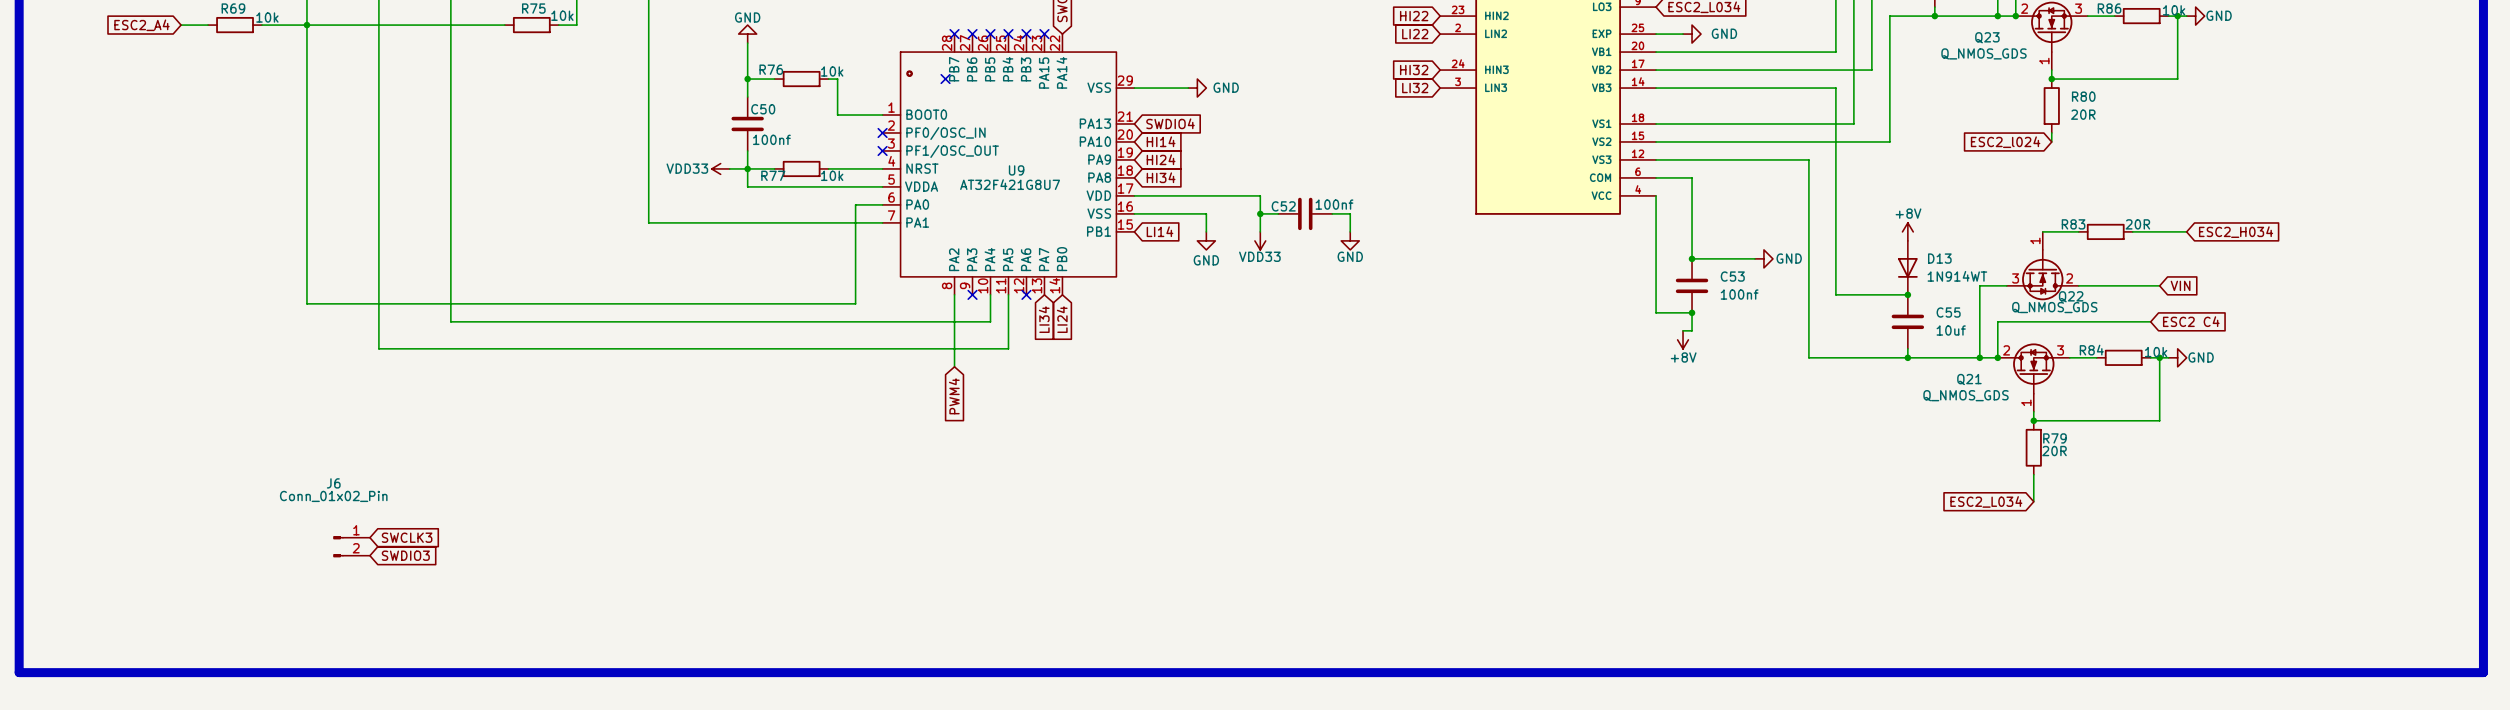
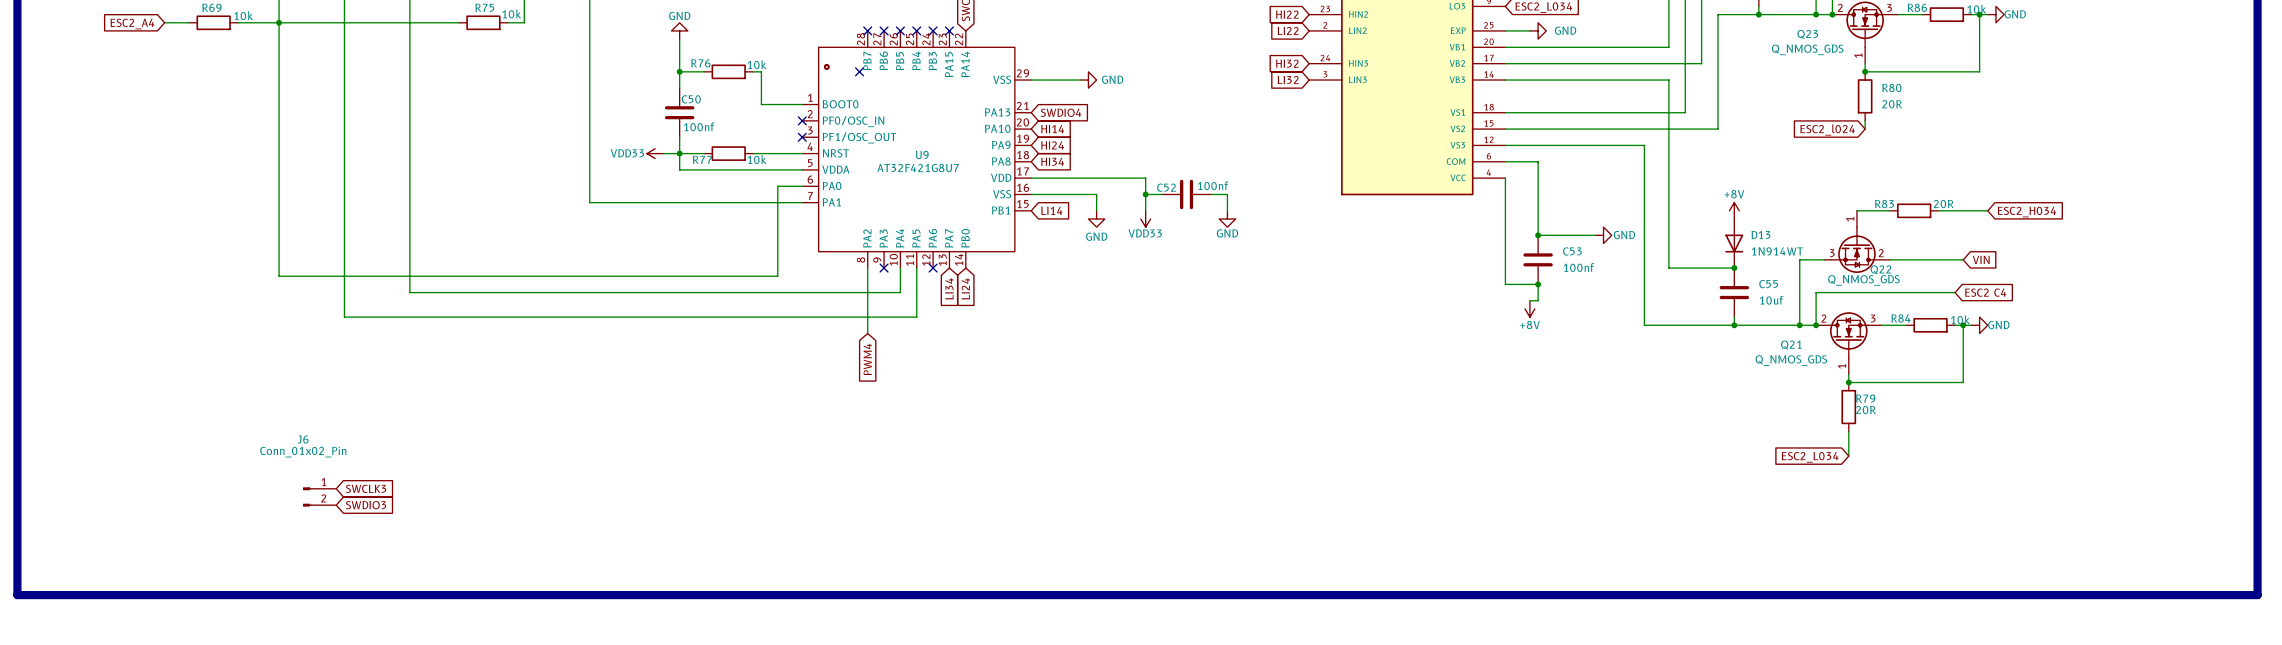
line: (19, 654) (19, 672) (2483, 672) (2483, 654) -> (17, 595) (2257, 595)

